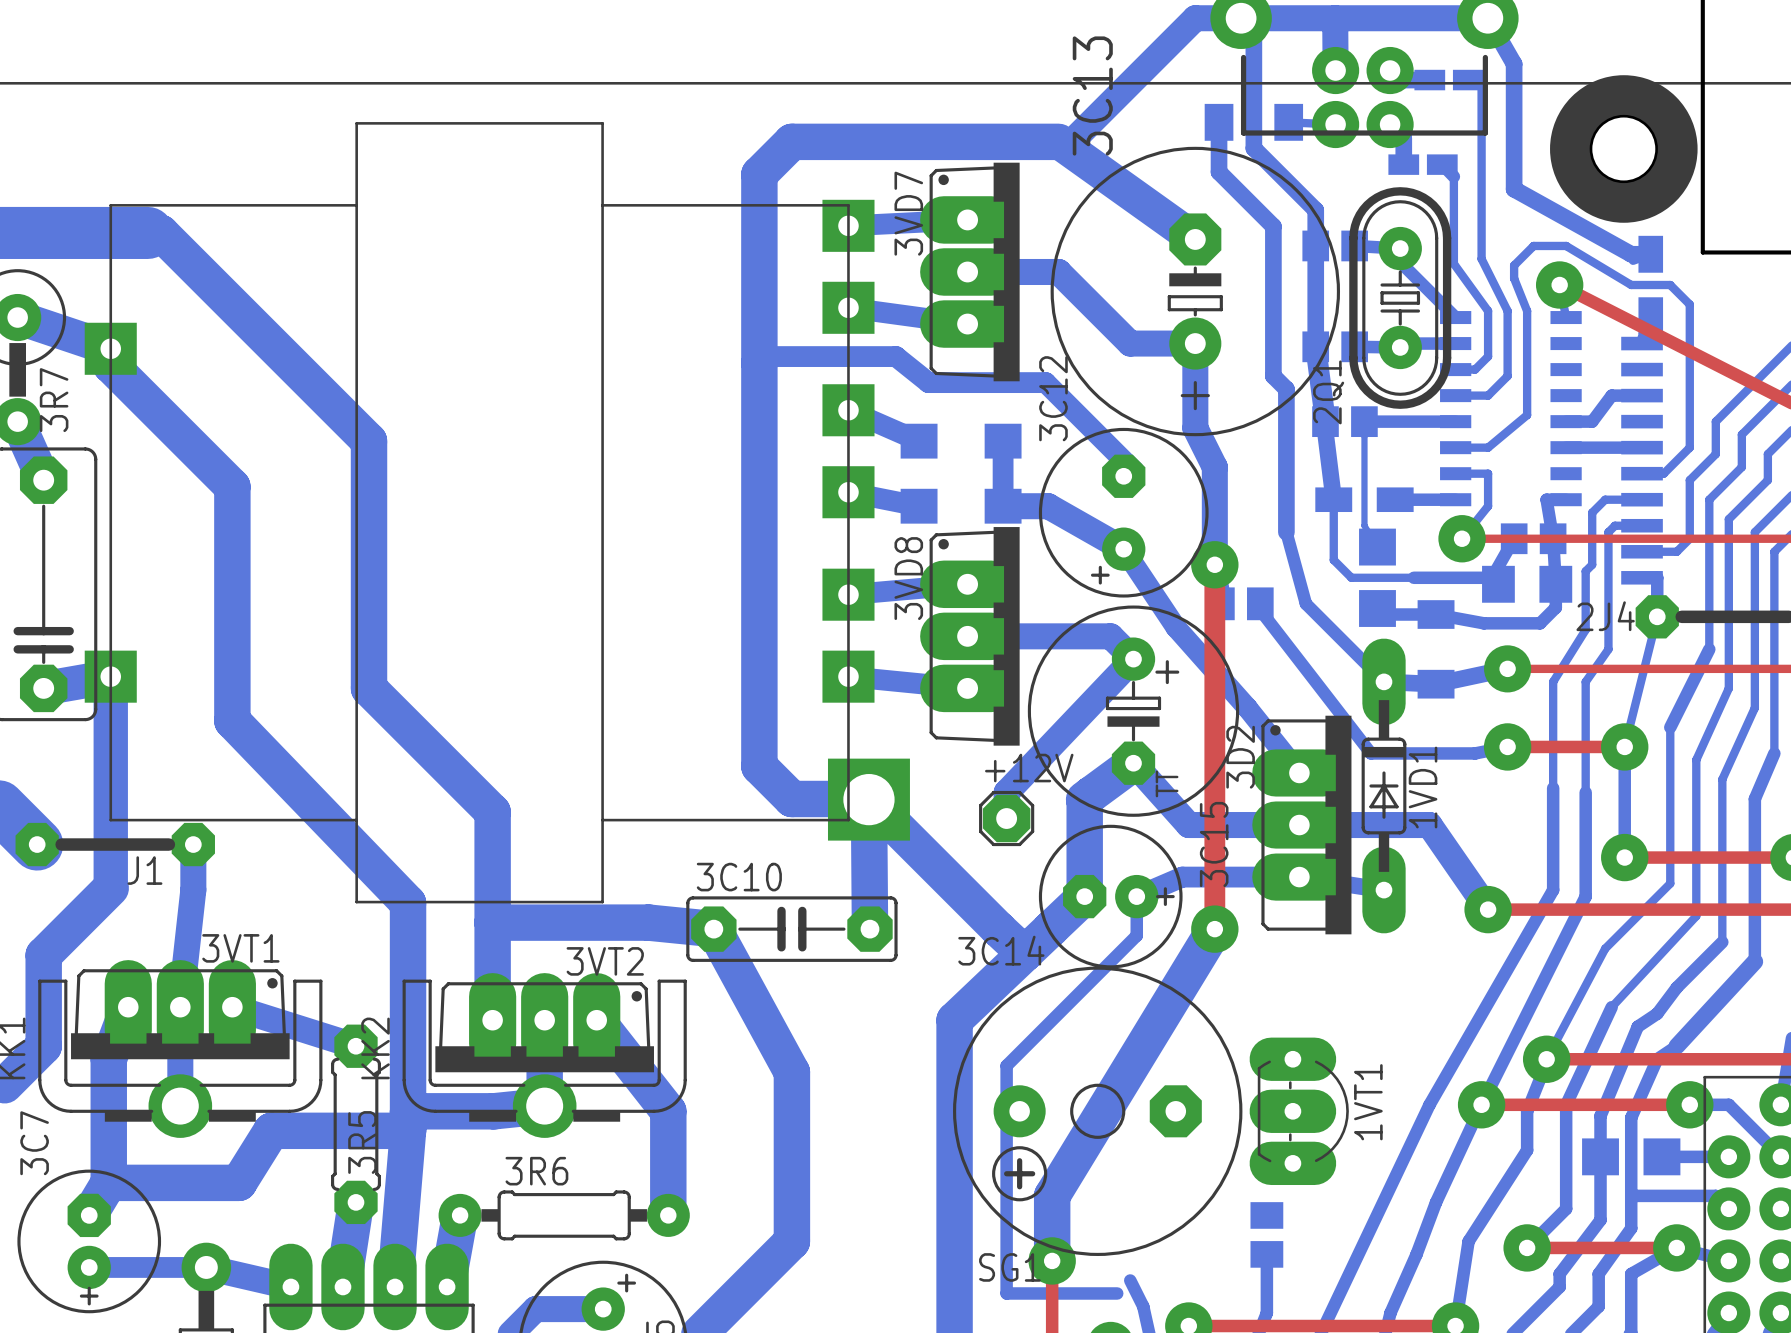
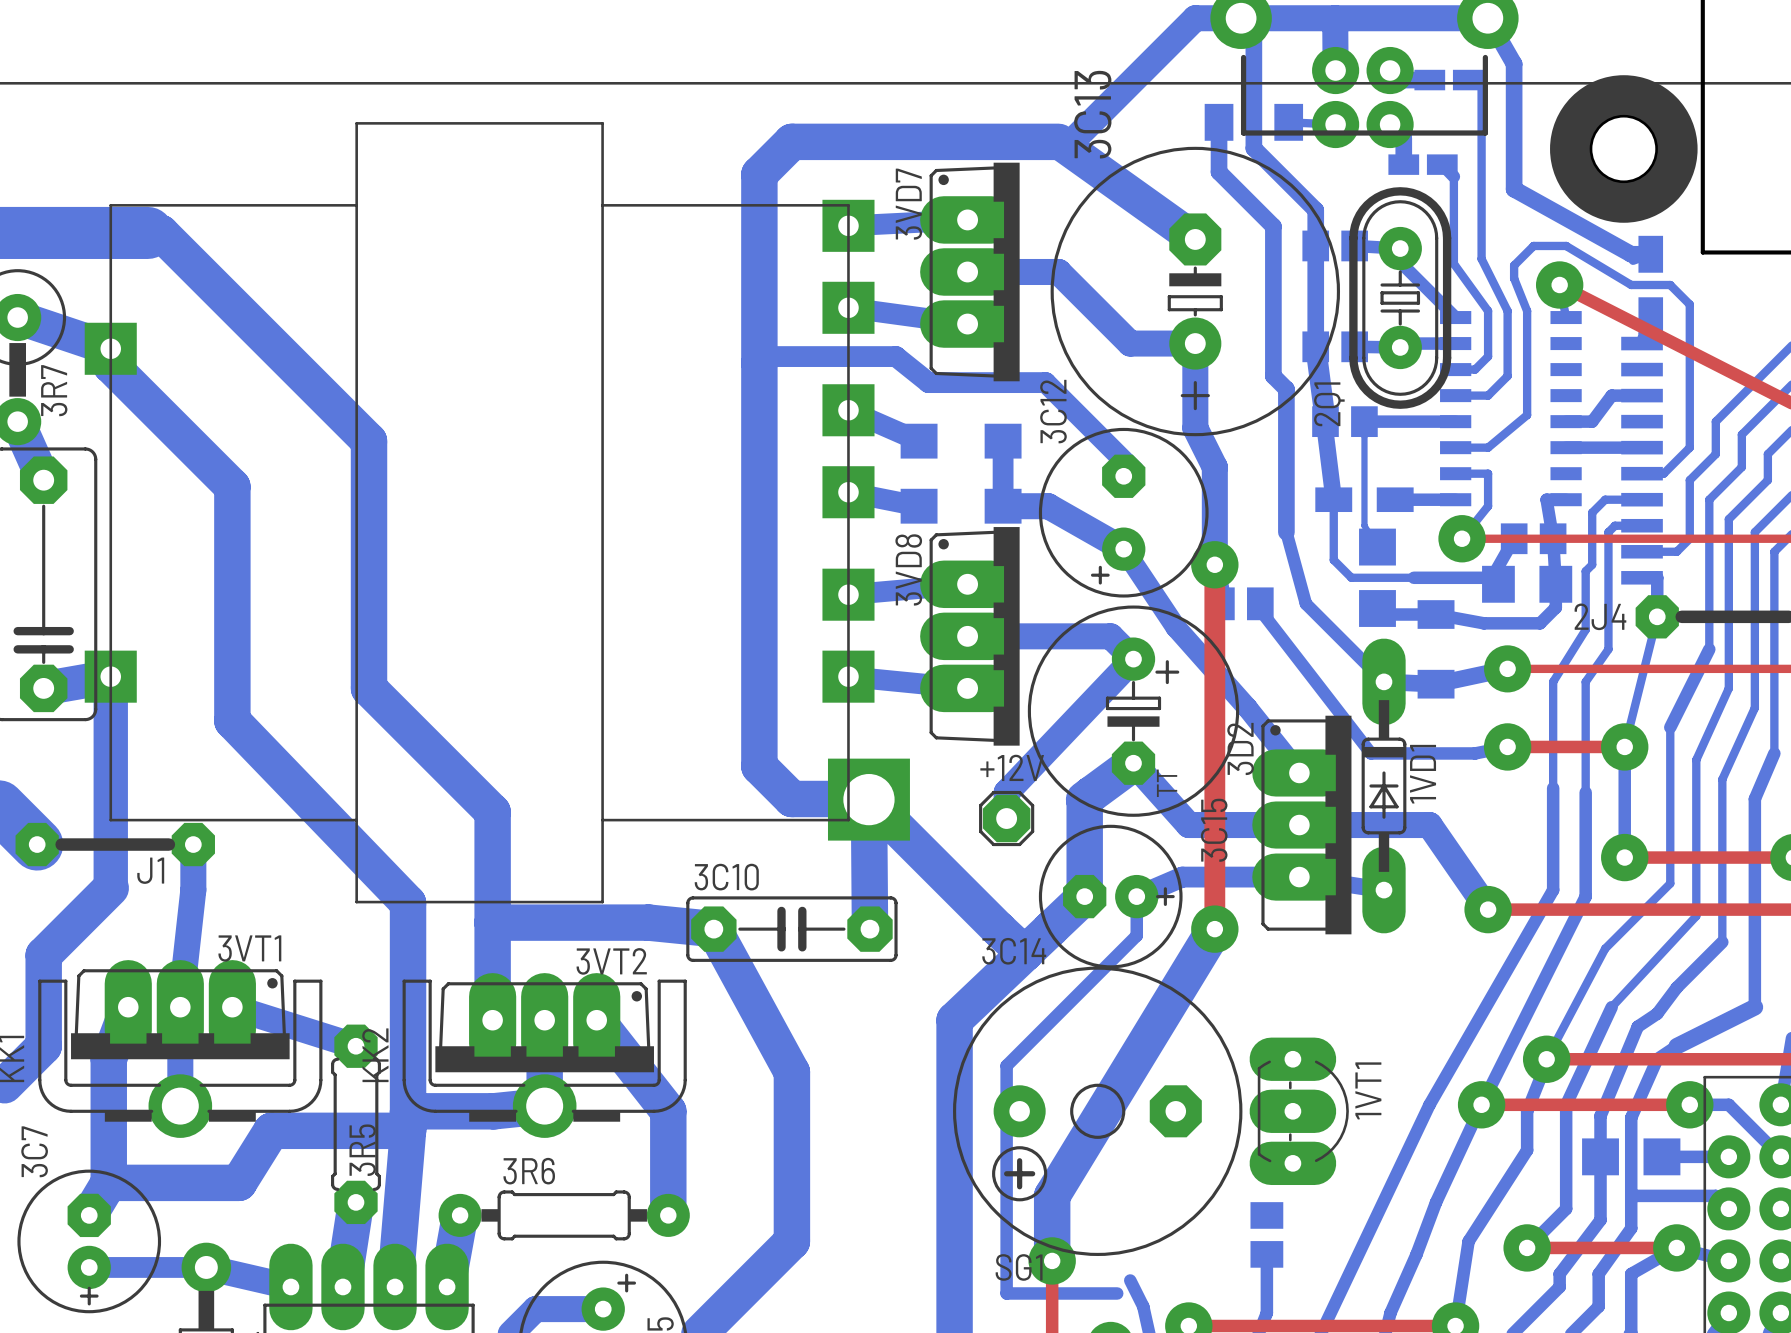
bottom track: (1754, 961) (1676, 1046) -> (1754, 961) (1754, 1007) (1676, 1046)

